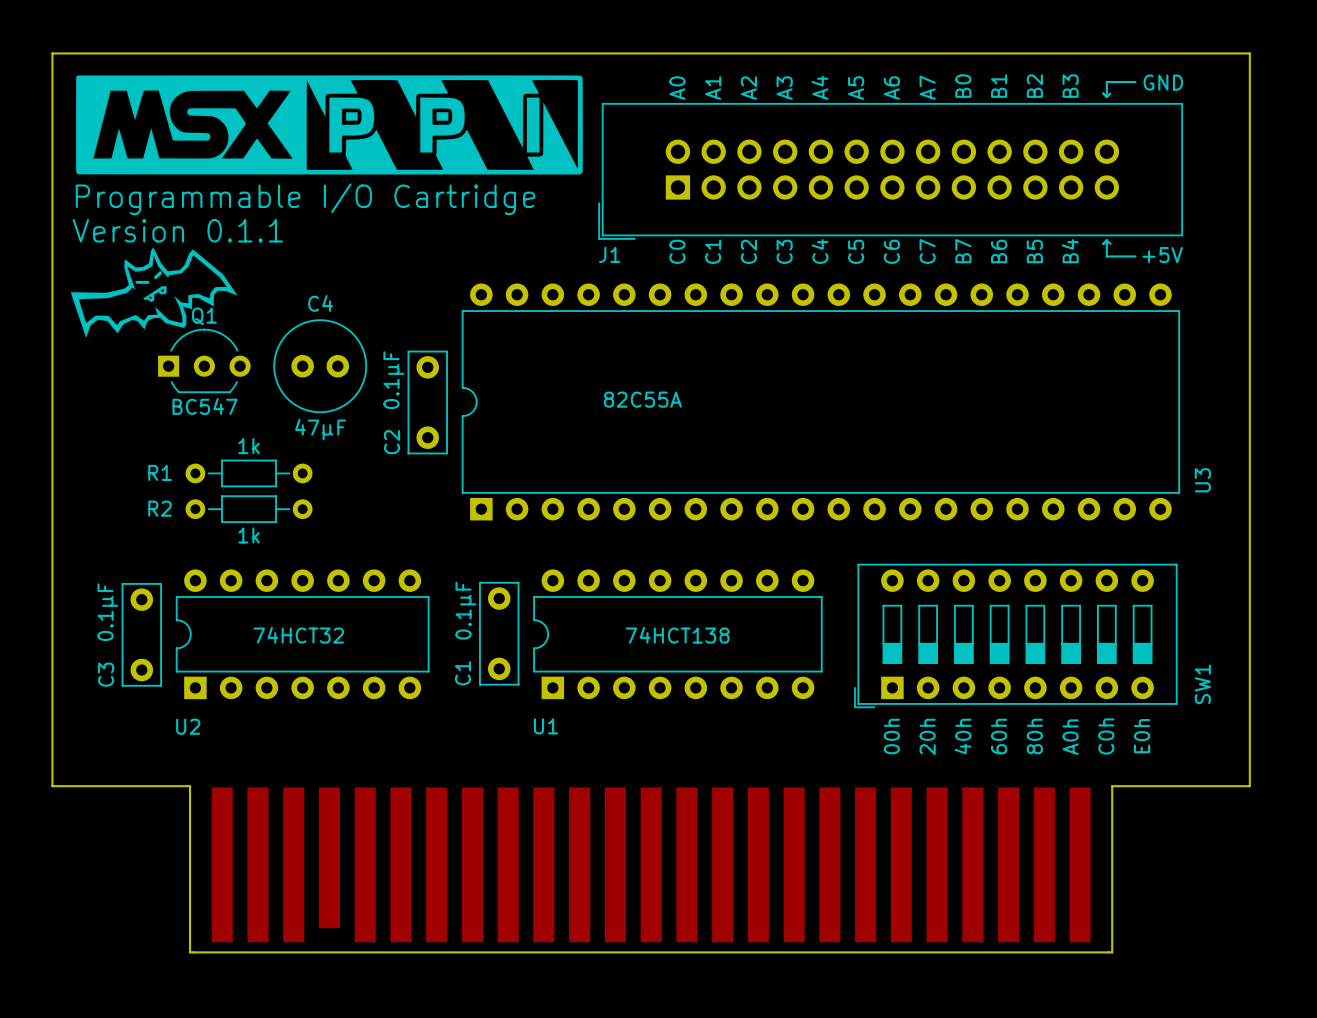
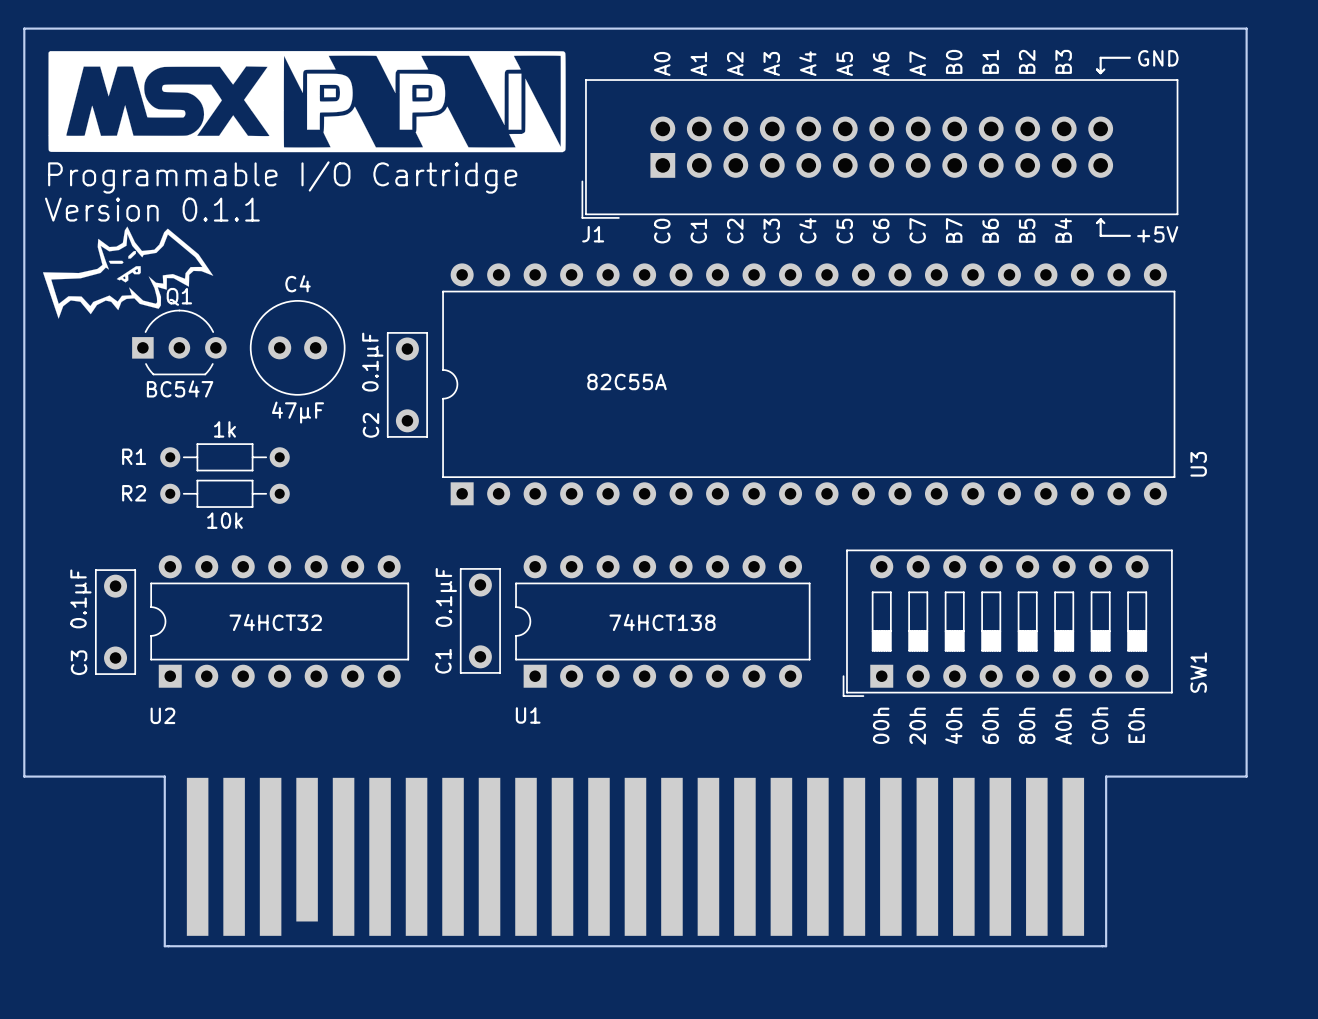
R1 value: 1k (249, 535) -> 10k (224, 520)

